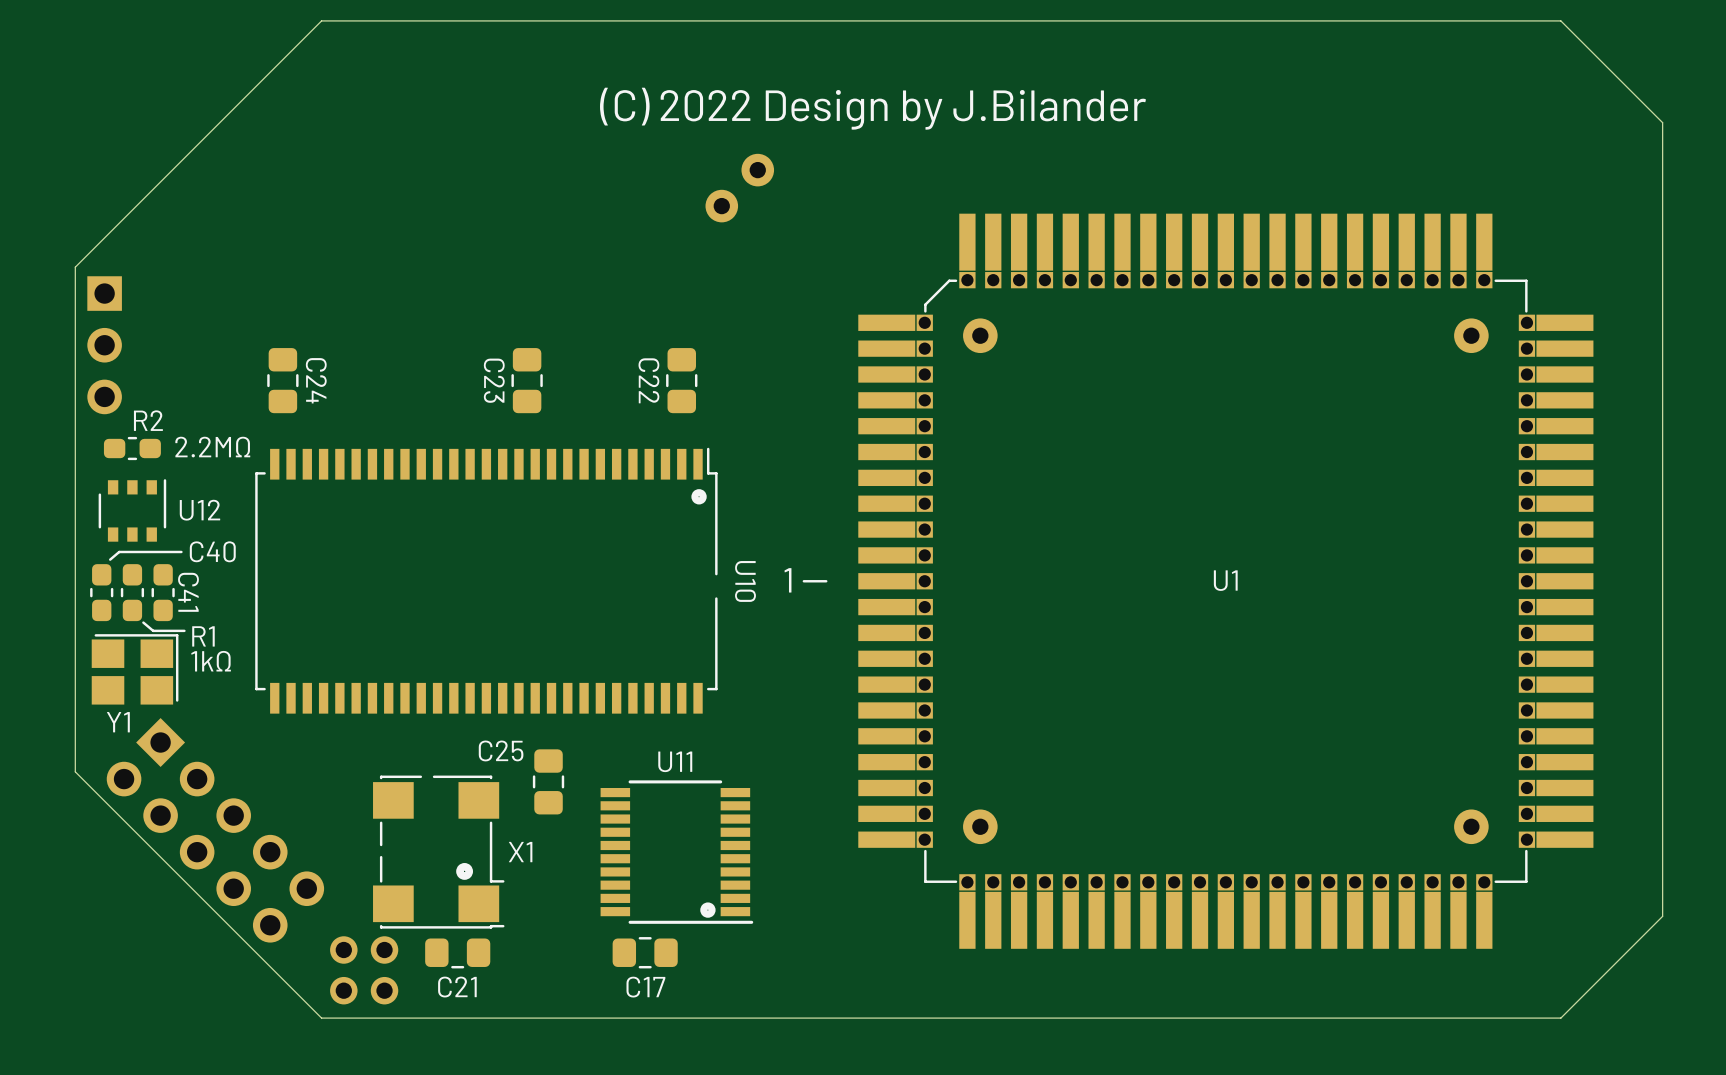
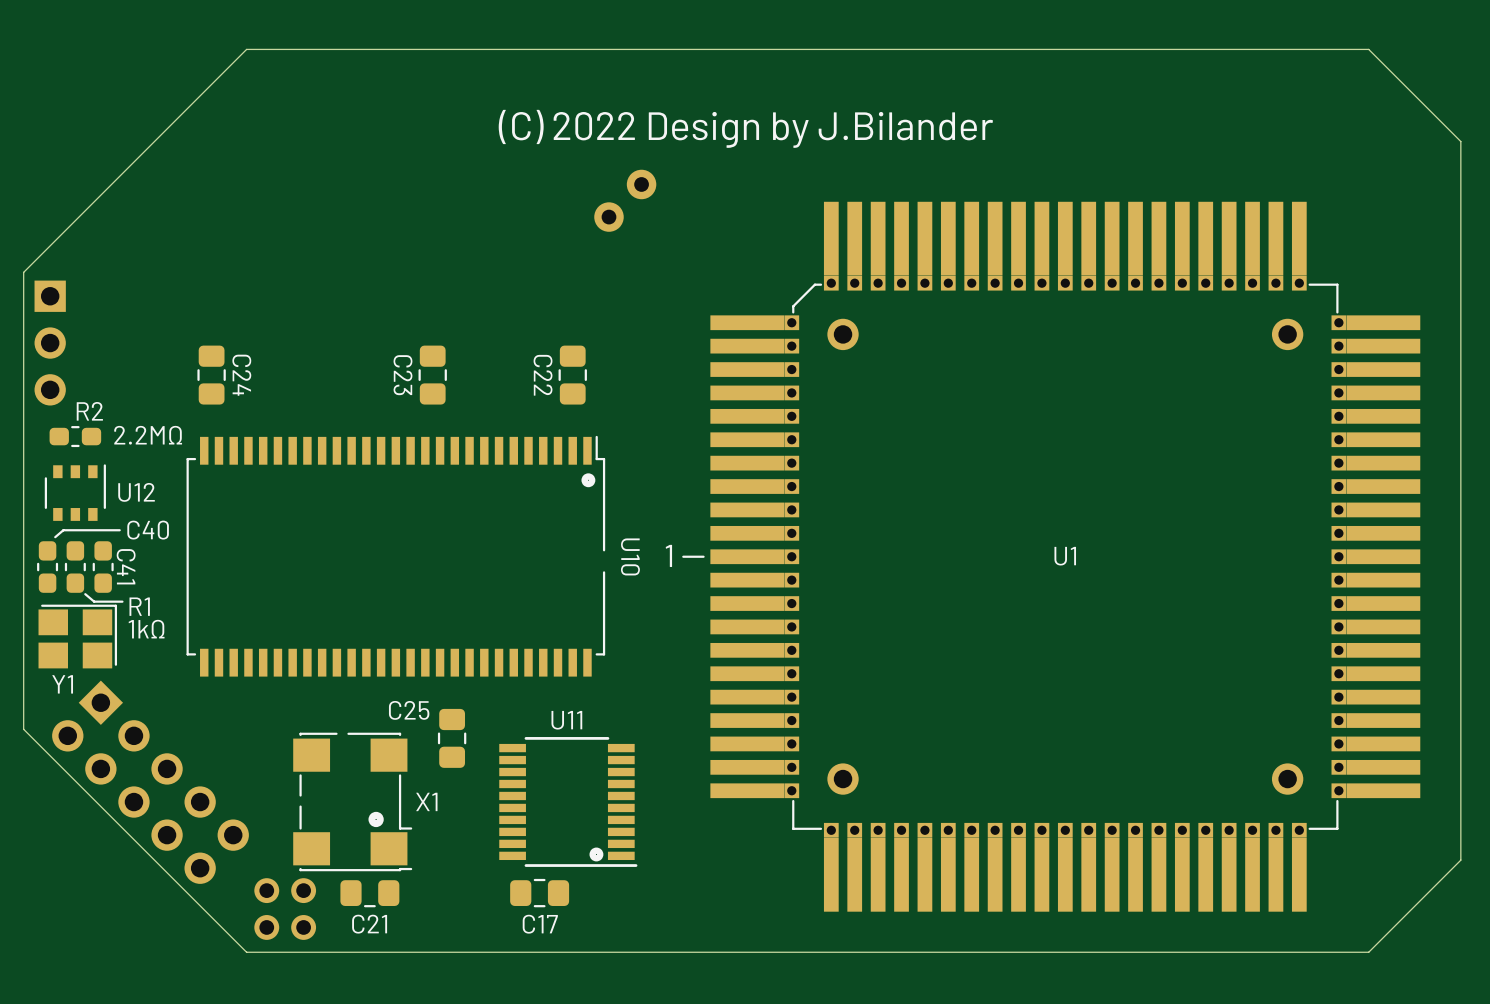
U1 footprint: [858, 213, 1594, 949] -> [710, 201, 1421, 912]
part footprint: [916, 272, 1536, 891] -> [784, 275, 1347, 838]
part: none -> (843, 334)
part: none -> (1287, 334)
part: none -> (843, 779)
part: none -> (1287, 779)

